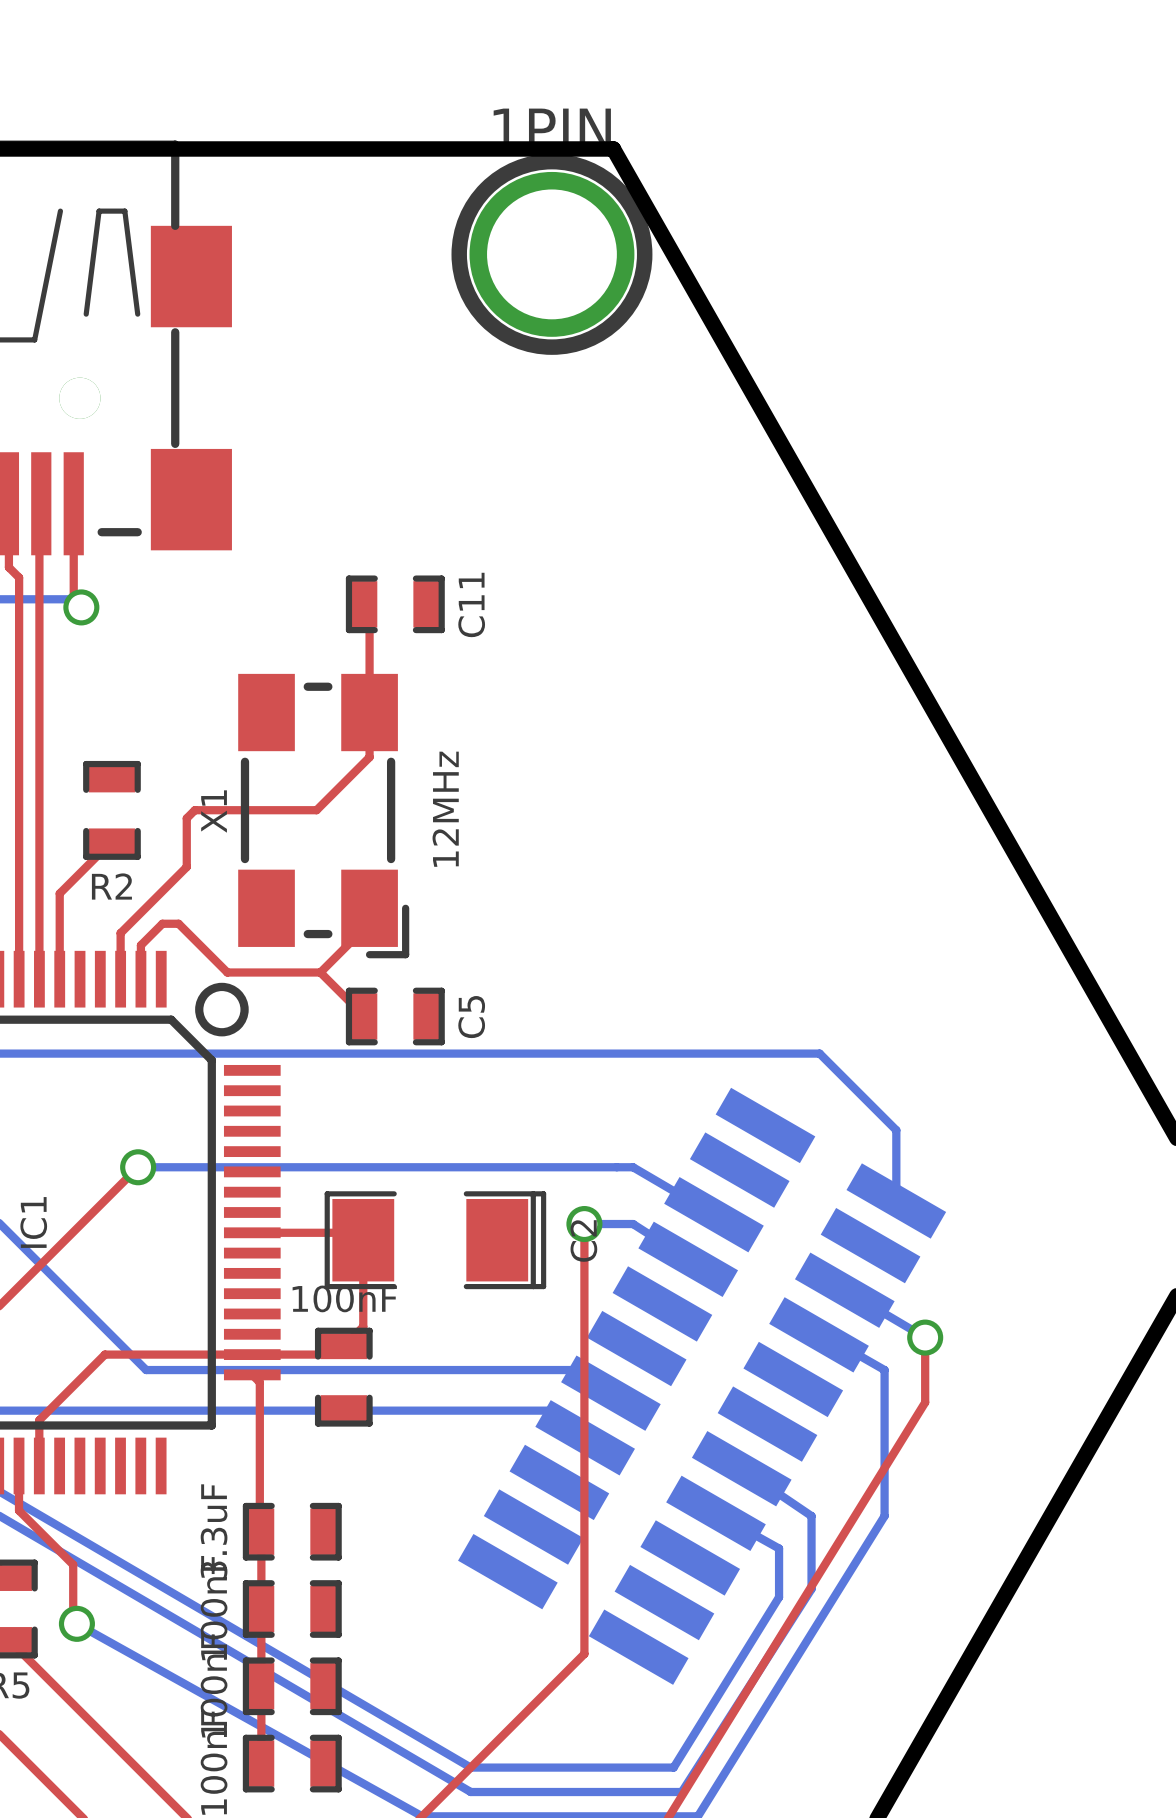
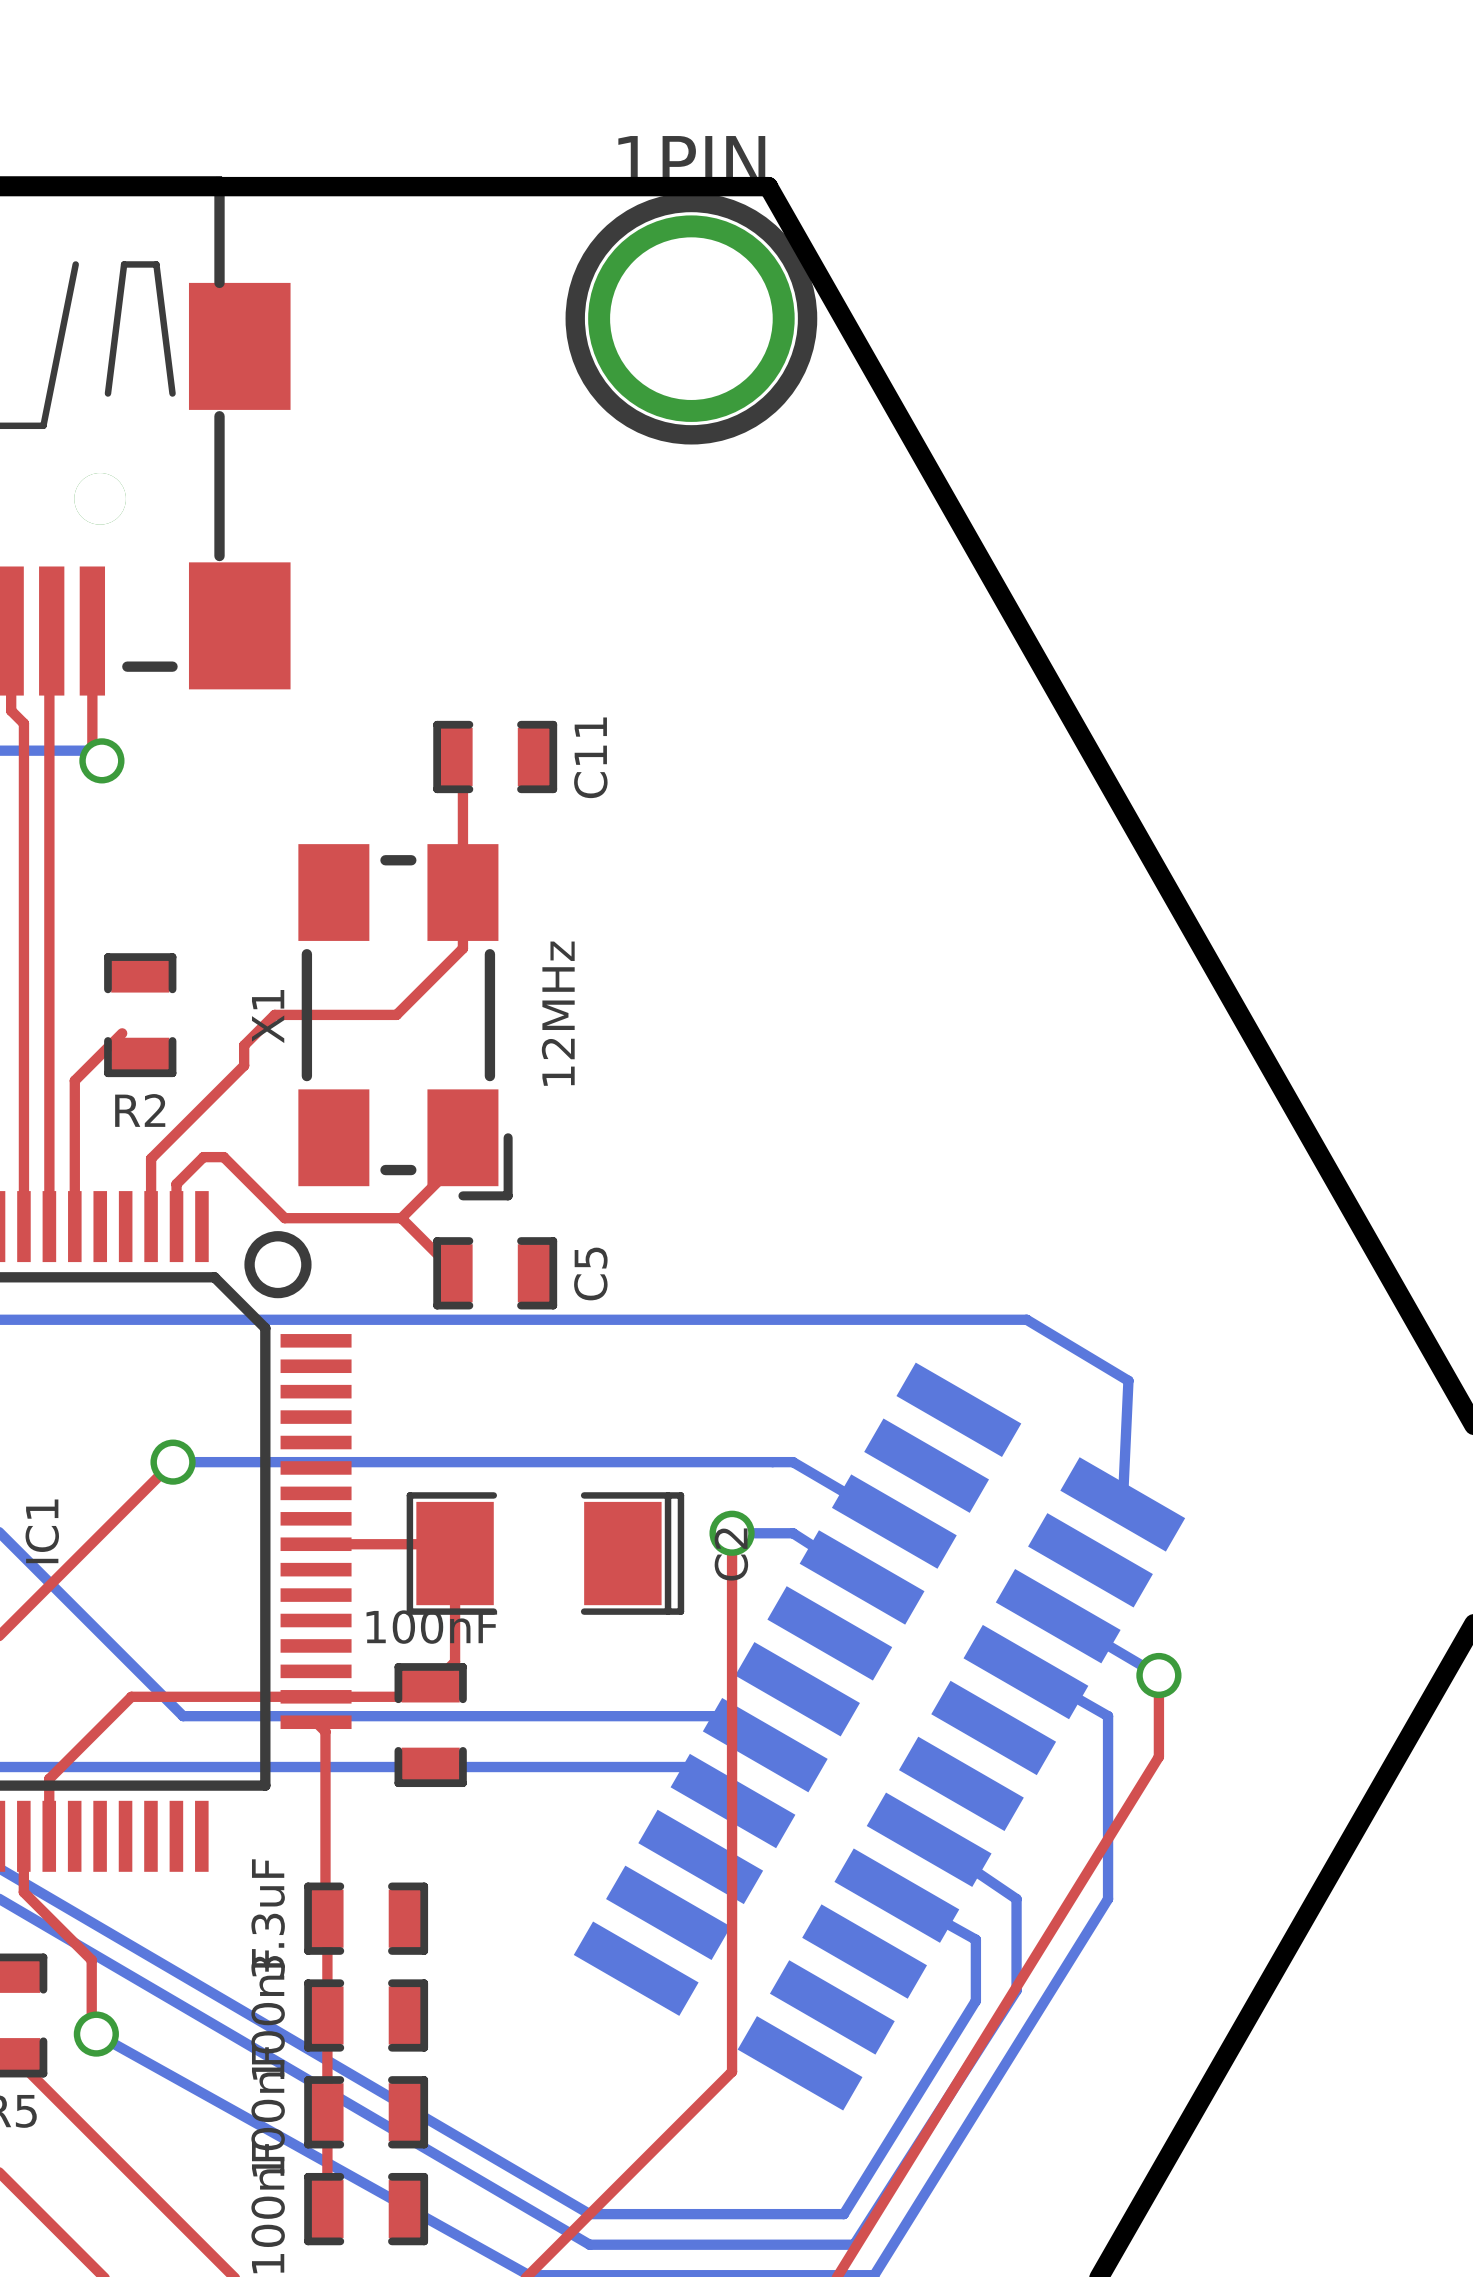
top track: (219, 810) (194, 810) (186, 818) (186, 866) (120, 933) -> (274, 1014) (244, 1045) (244, 1065) (151, 1158) (151, 1168)
top track: (111, 841) (59, 893) -> (122, 1033) (74, 1080) (74, 1119)
bottom track: (819, 1053) (896, 1130) (896, 1200) -> (1026, 1319) (1128, 1380) (1122, 1504)

